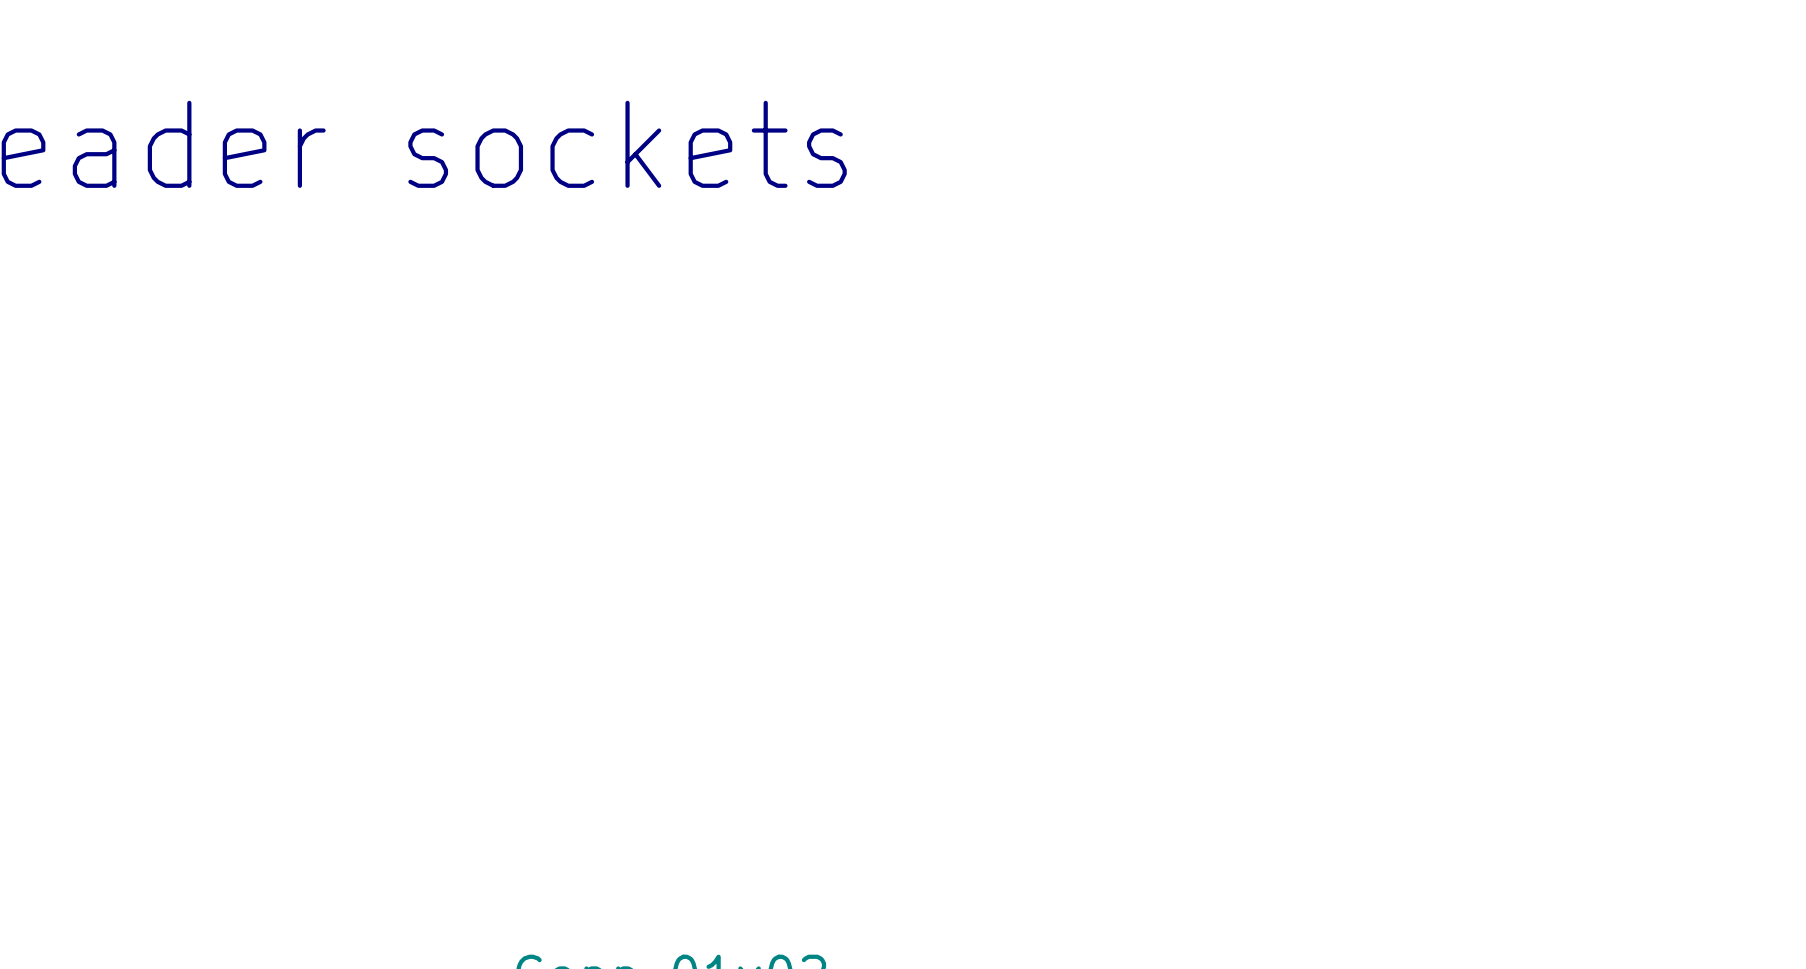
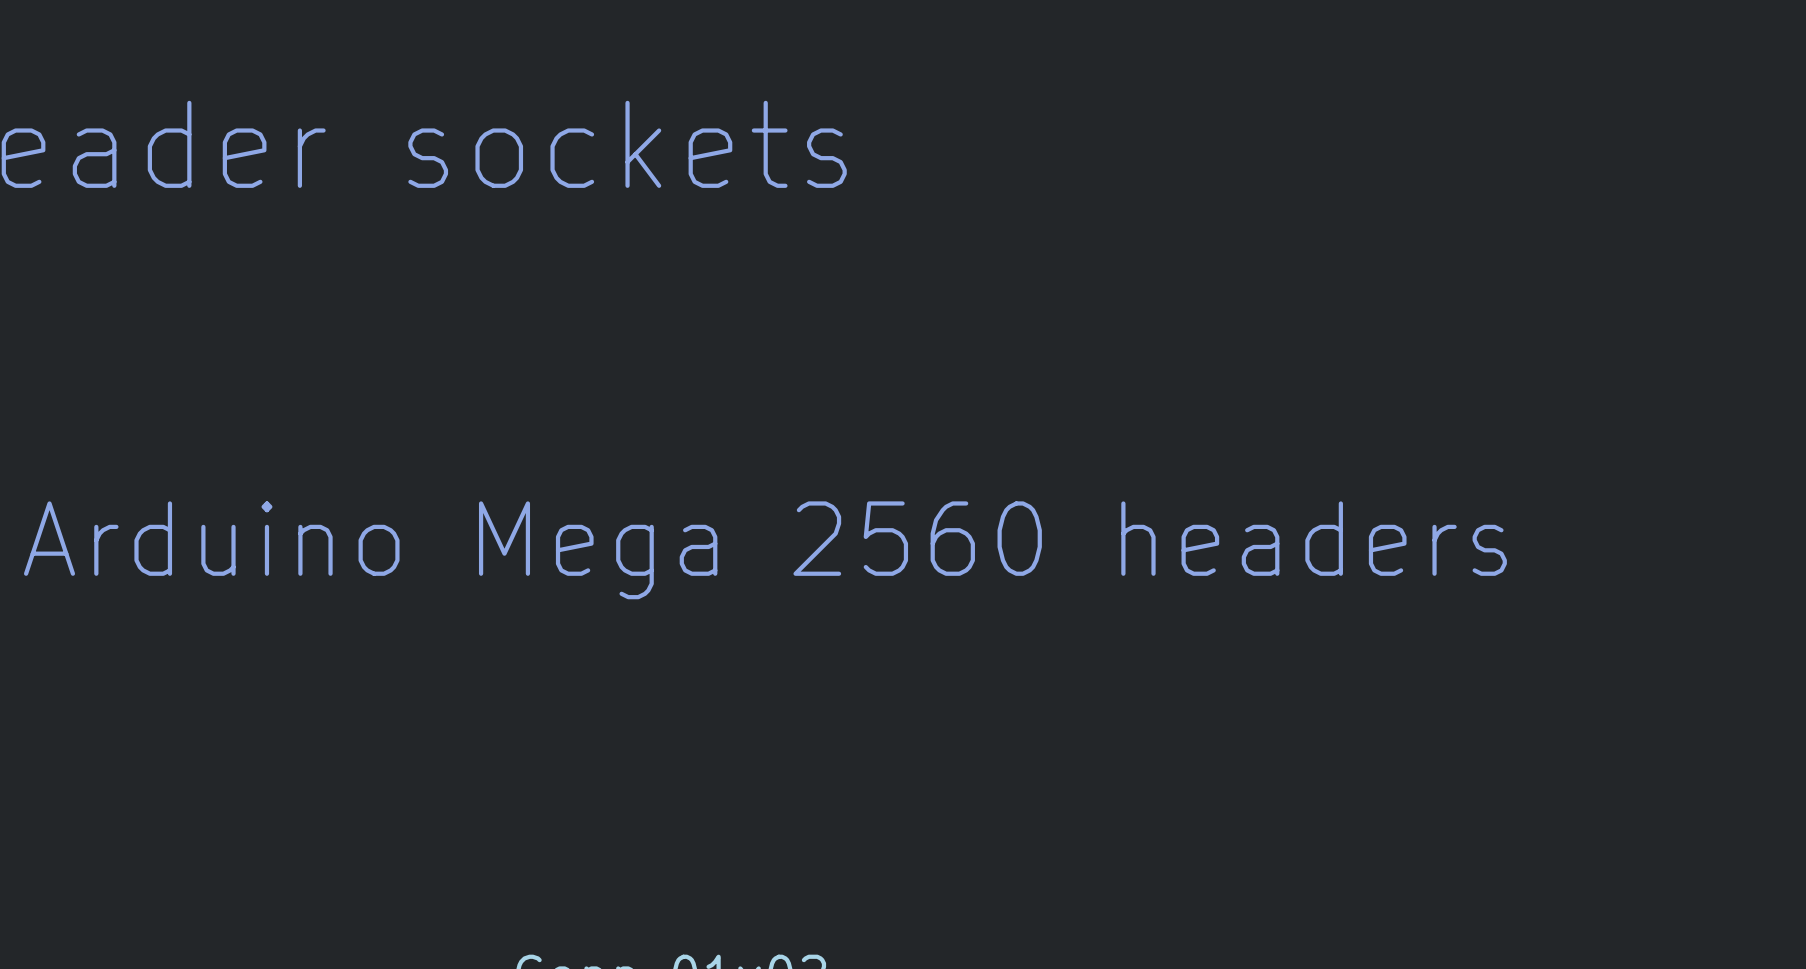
text: none -> Arduino Mega 2560 headers (765, 550)

